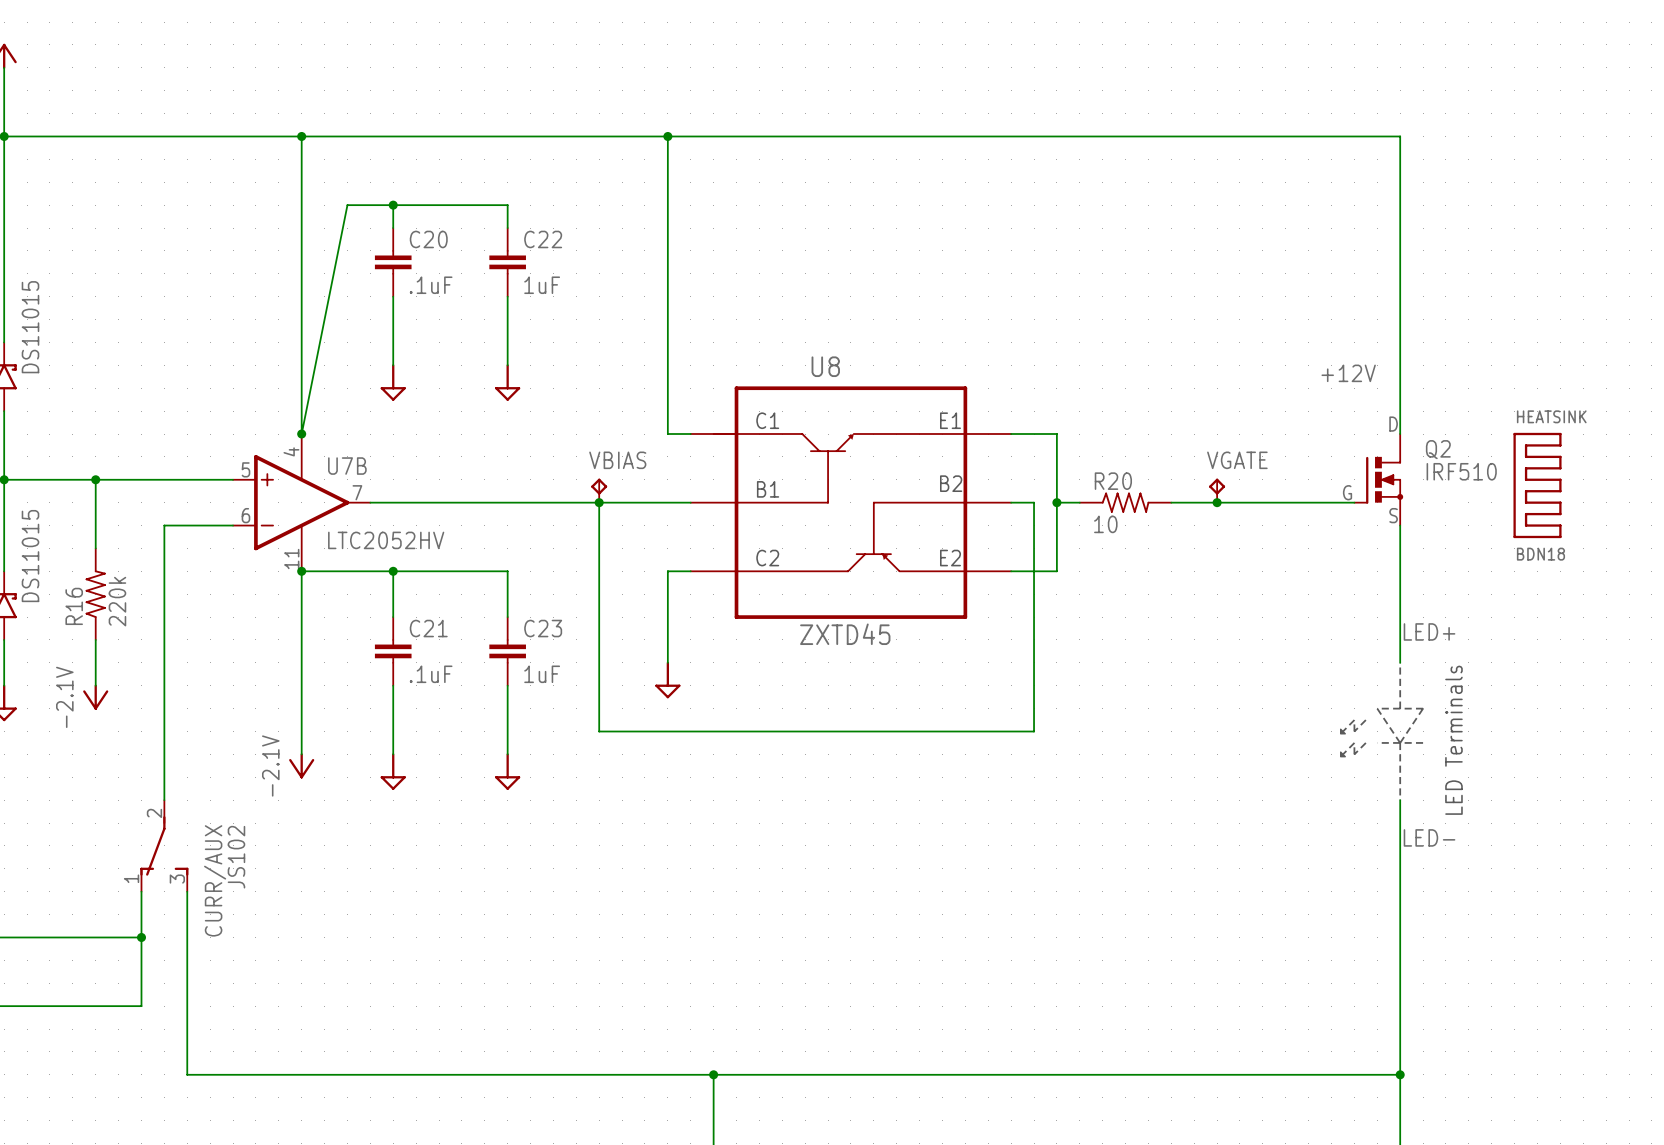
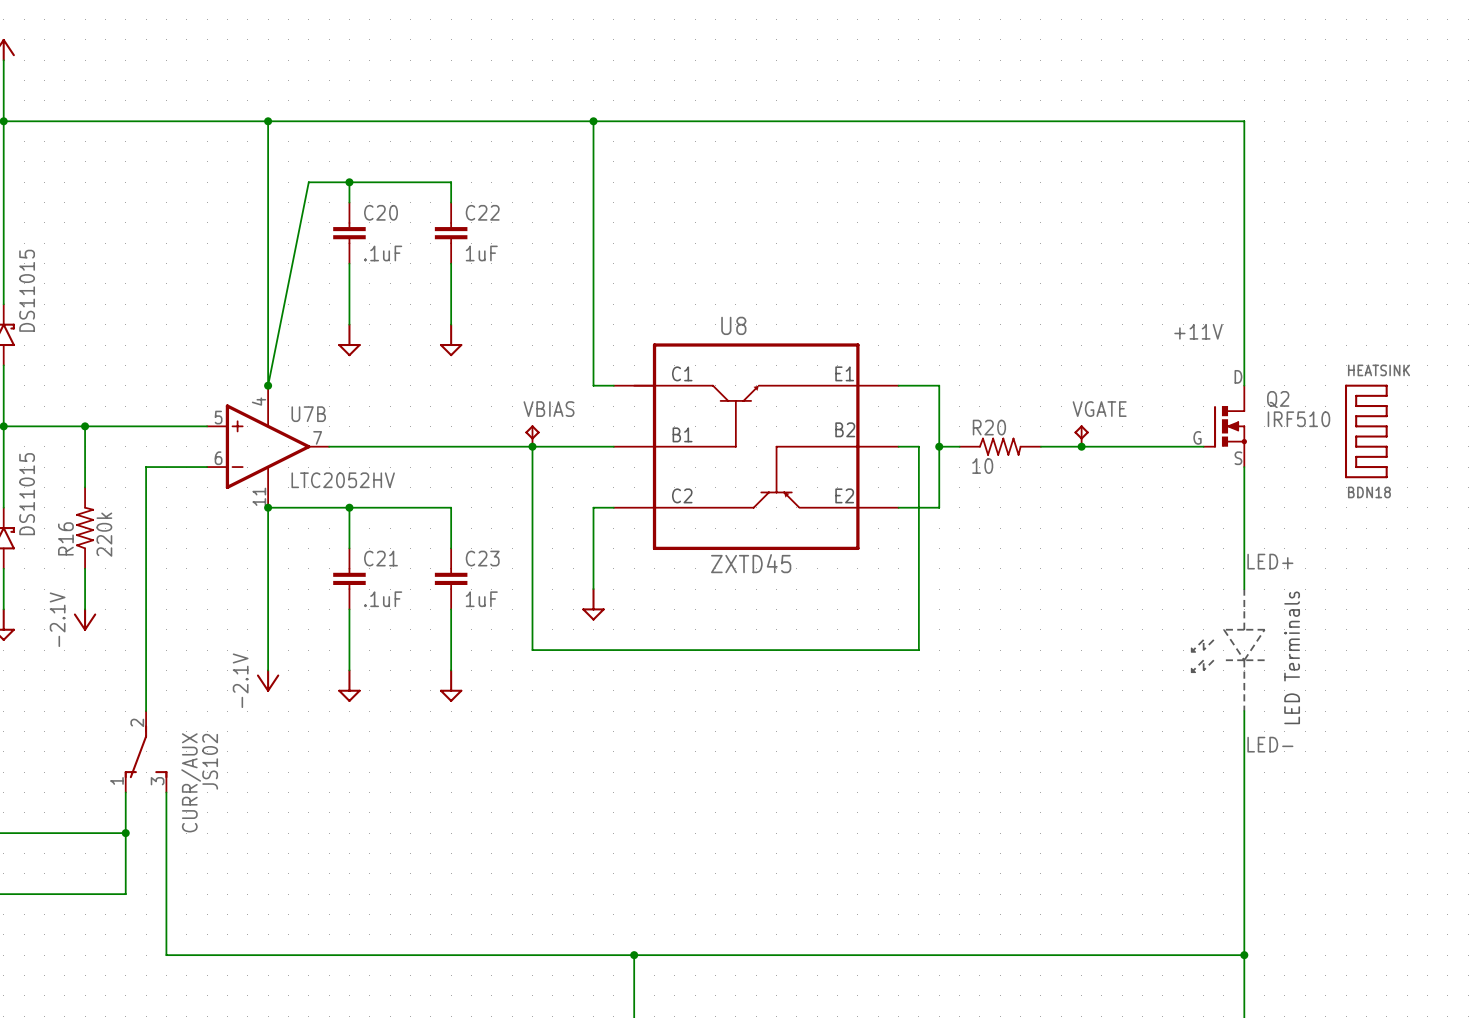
label: +12V (1348, 373) -> +11V (1198, 331)

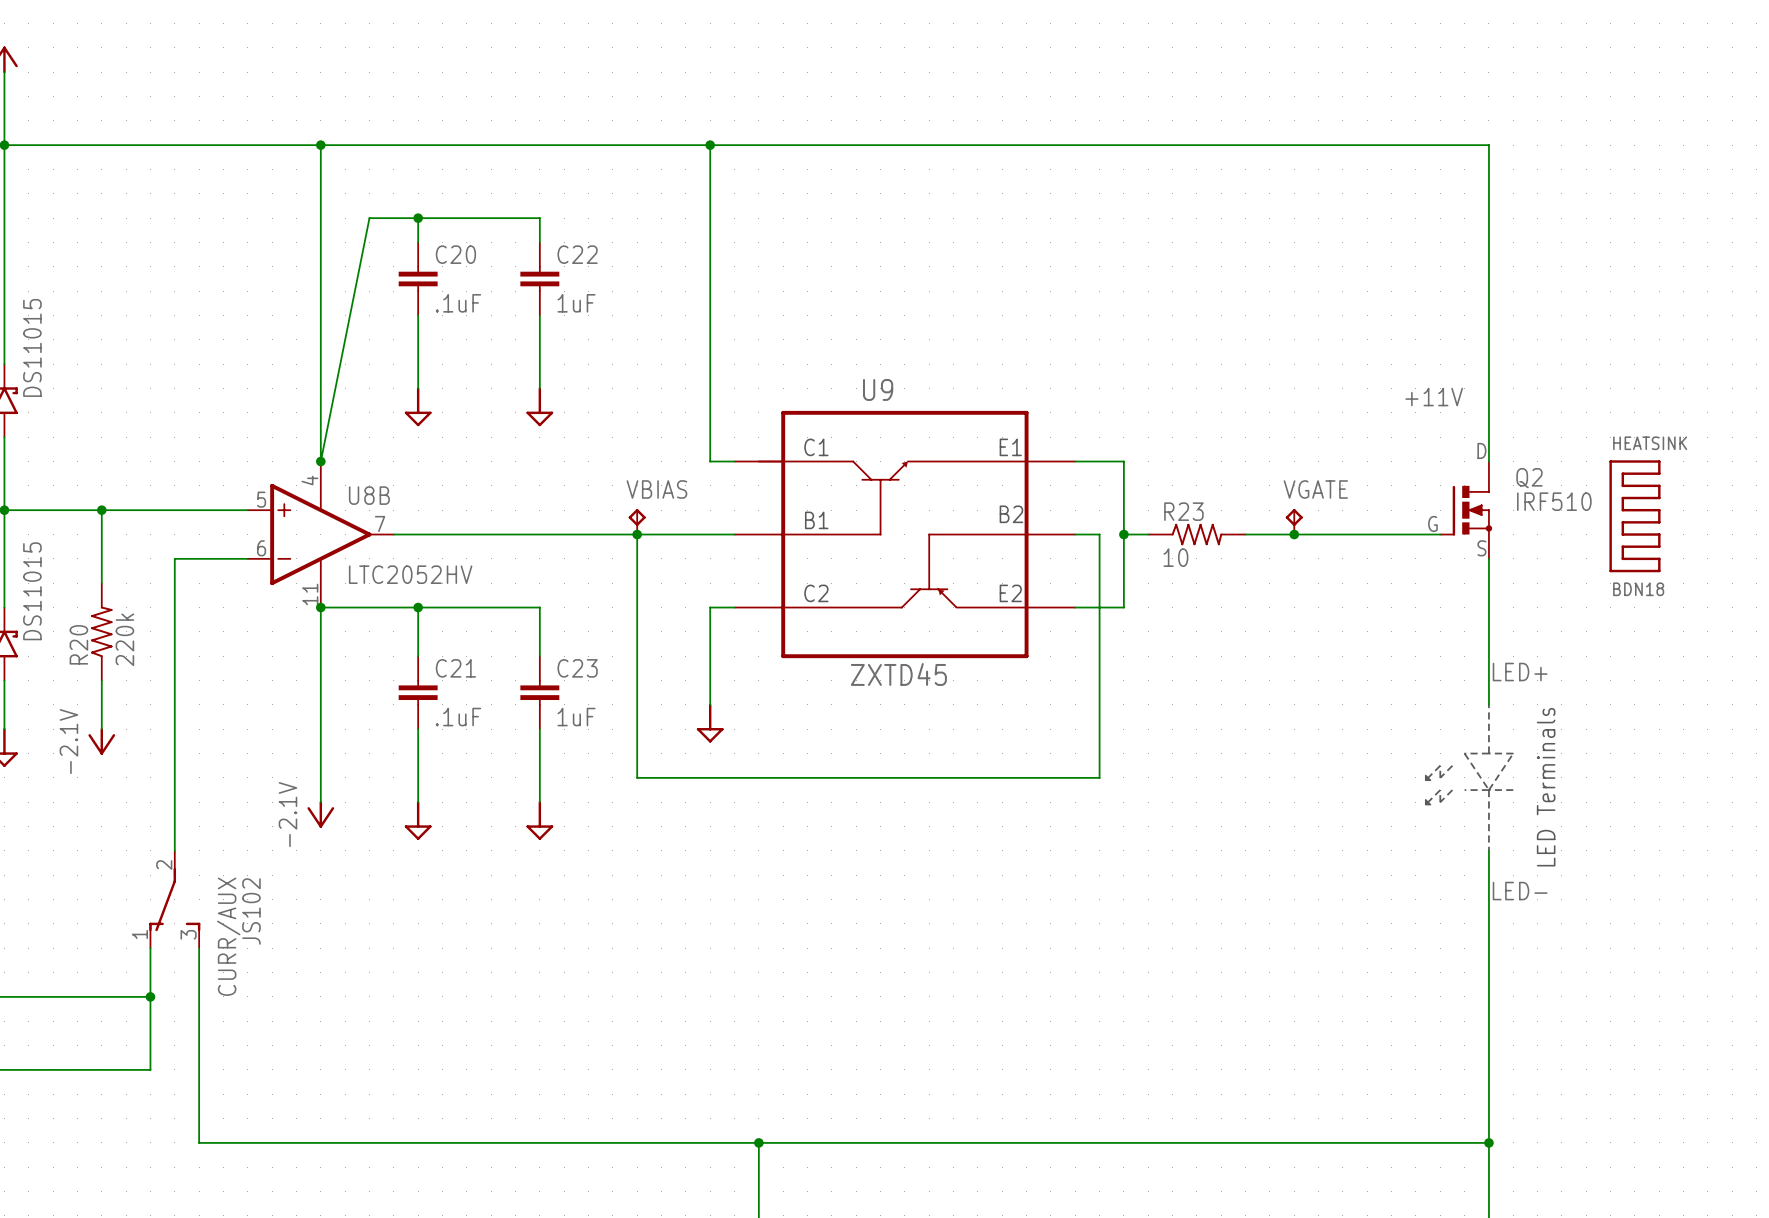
U8 name: U8 (733, 325) -> U9 (878, 389)
U7B name: U7B (308, 414) -> U8B (369, 495)
R20 name: R20 (989, 427) -> R23 (1183, 511)
R16 name: R16 (65, 538) -> R20 (78, 644)

